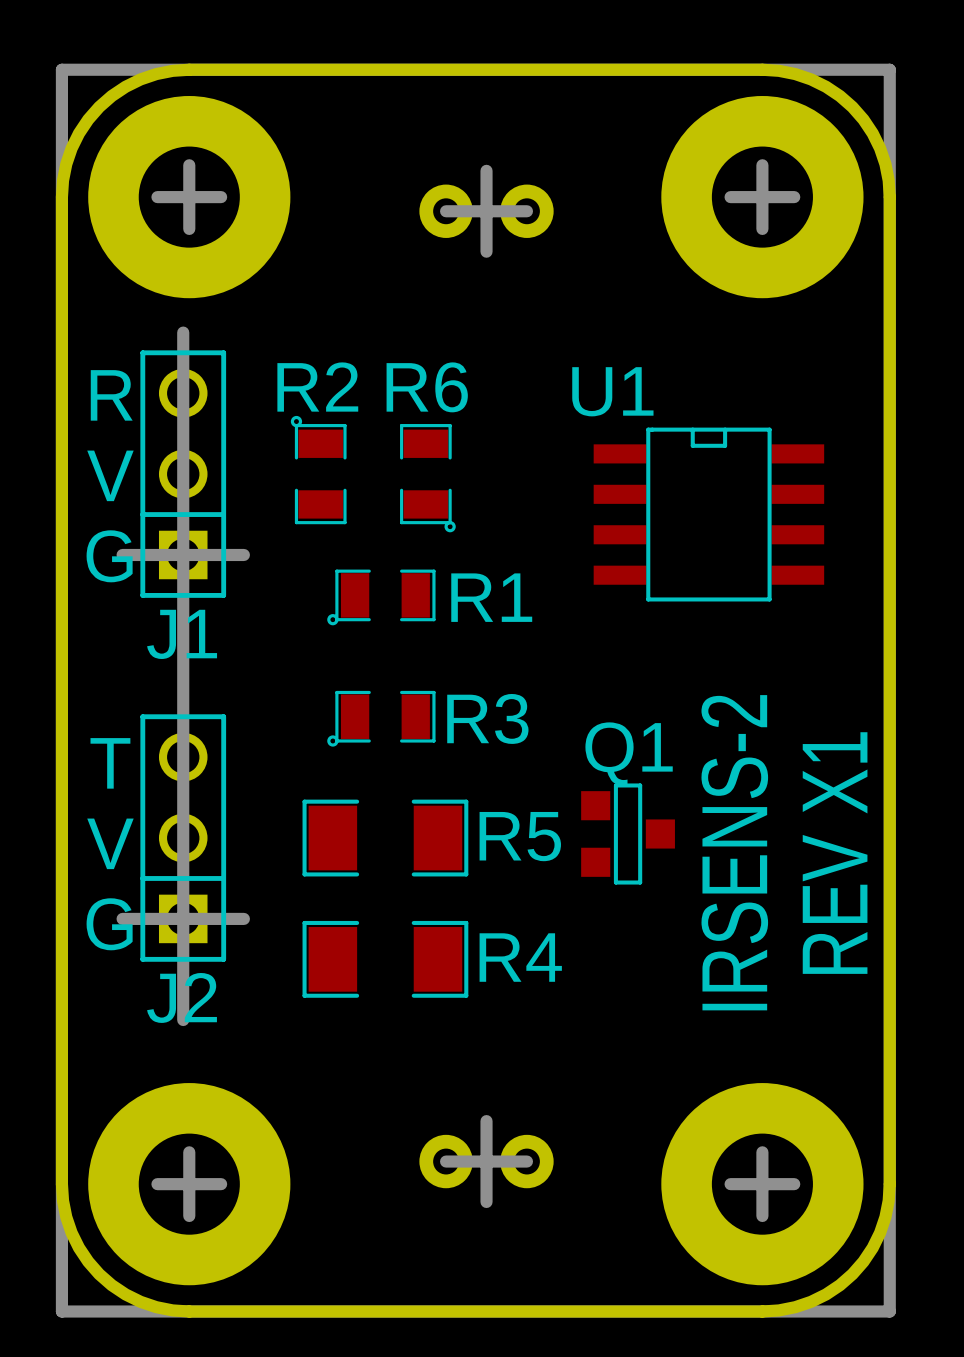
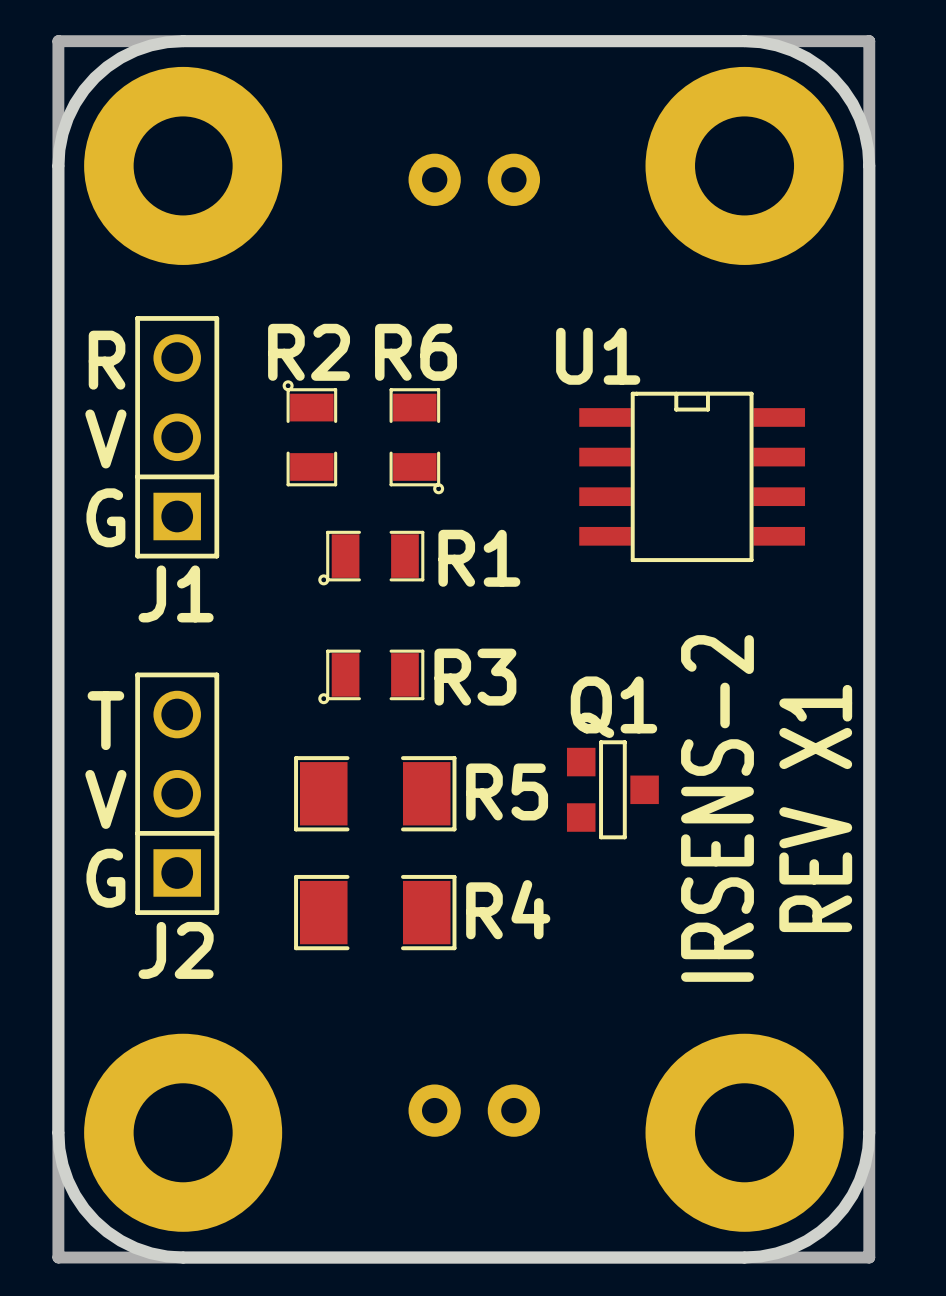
line: (189, 165) (189, 228) -> none
line: (762, 165) (762, 228) -> none
line: (486, 170) (486, 251) -> none
line: (157, 197) (221, 197) -> none
line: (730, 197) (794, 197) -> none
line: (446, 211) (526, 211) -> none
line: (183, 332) (183, 1020) -> none
line: (122, 554) (243, 554) -> none
line: (122, 918) (243, 918) -> none
line: (486, 1121) (486, 1201) -> none
line: (189, 1152) (189, 1215) -> none
line: (762, 1152) (762, 1215) -> none
line: (446, 1161) (526, 1161) -> none
line: (157, 1184) (221, 1184) -> none
line: (730, 1184) (794, 1184) -> none

